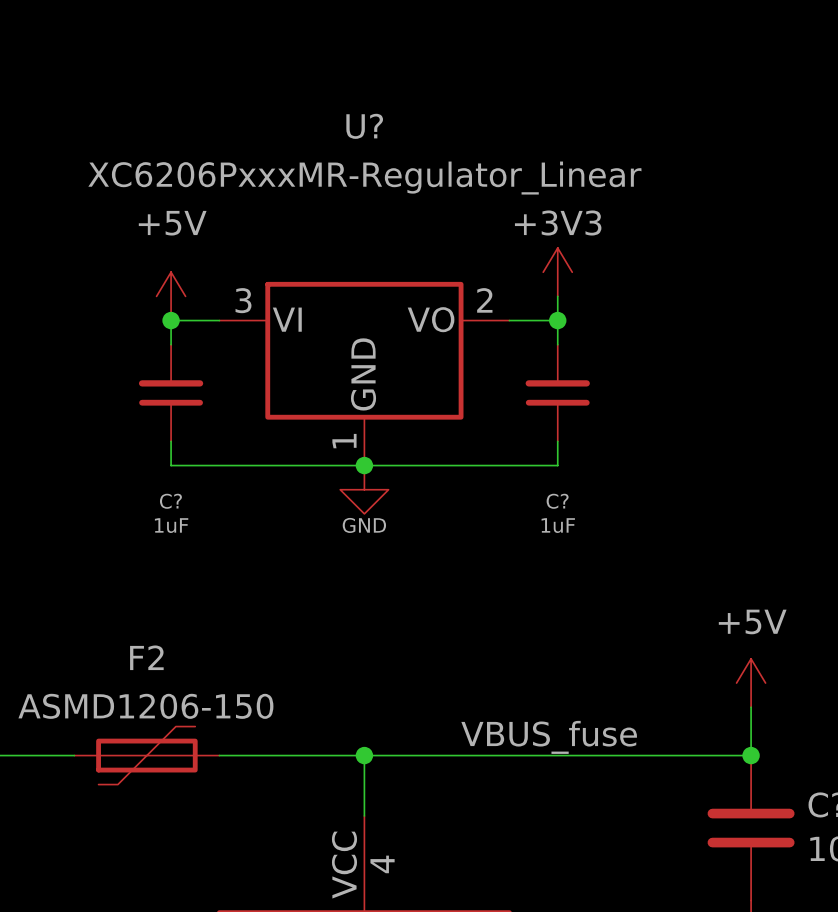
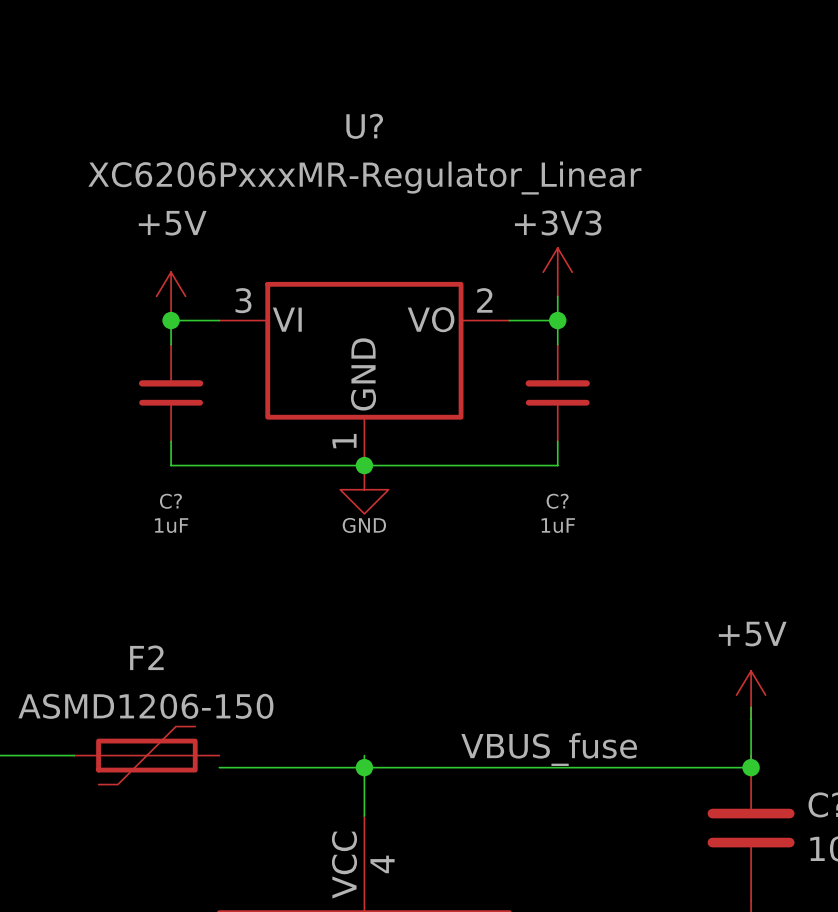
power symbol position: +5V (751, 683) -> +5V (751, 695)
label position: VBUS_fuse (549, 737) -> VBUS_fuse (549, 749)
wire: (219, 755) (751, 755) -> (219, 767) (751, 767) (751, 755)
junction position: (364, 755) -> (364, 767)
junction position: (751, 755) -> (751, 767)

